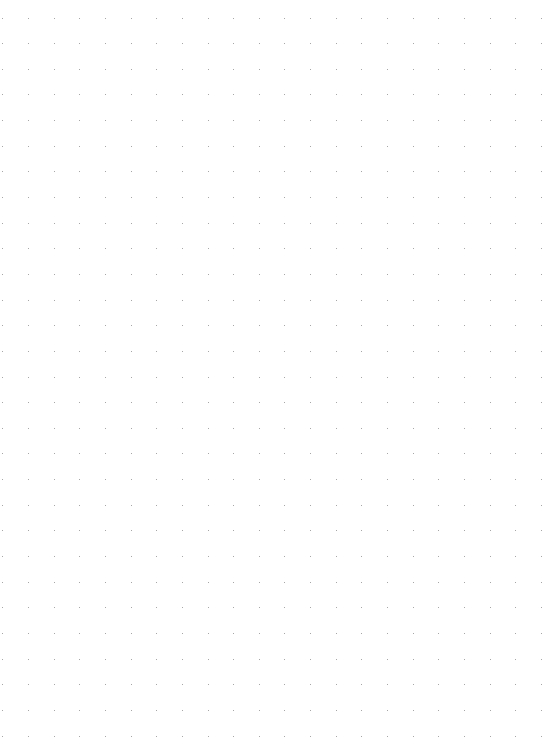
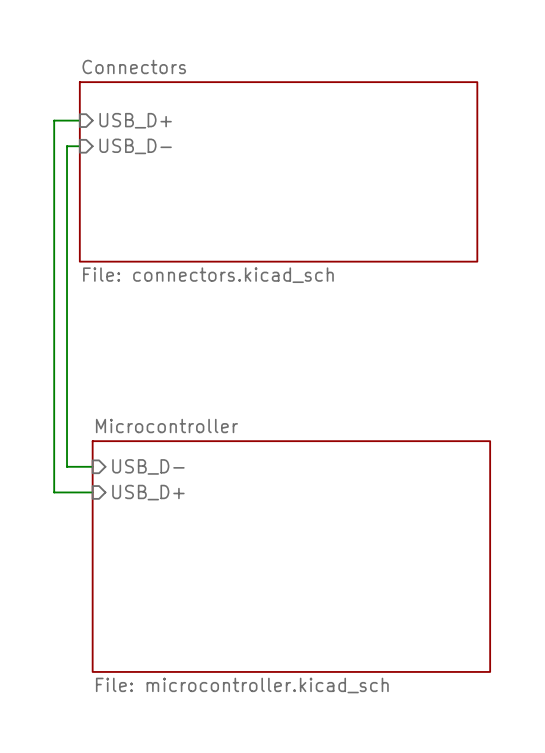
wire: none -> (79, 120) (54, 120) (54, 492) (92, 492)
sheet pin: none -> USB_D+ (135, 120)
wire: none -> (79, 146) (67, 146) (67, 466) (92, 466)
sheet pin: none -> USB_D- (135, 146)
sheet Connectors: none -> File: connectors.kicad_sch (278, 171)
sheet pin: none -> USB_D- (148, 466)
sheet pin: none -> USB_D+ (148, 492)
sheet Microcontroller: none -> File: microcontroller.kicad_sch (291, 556)

